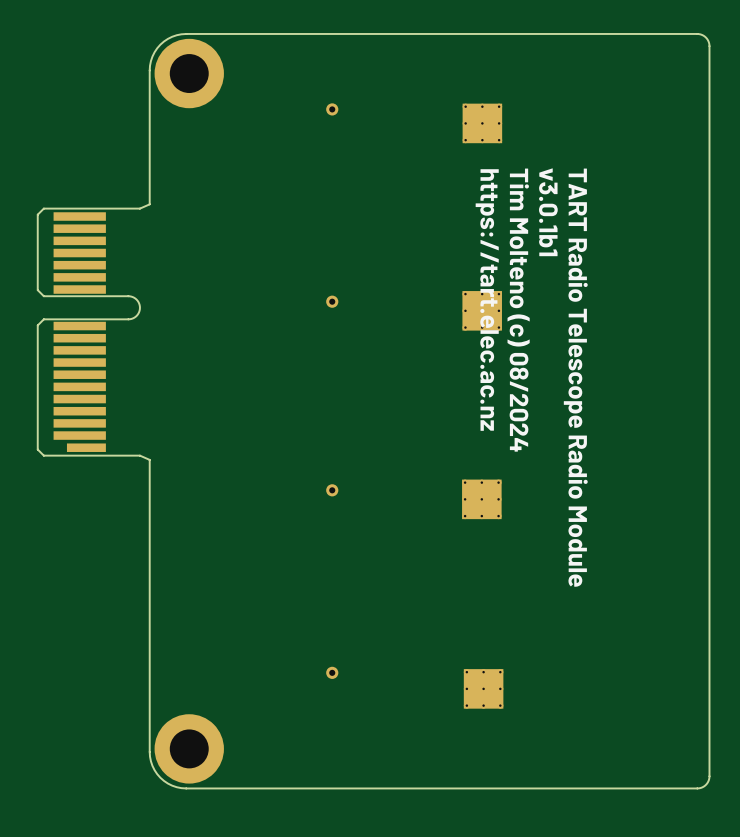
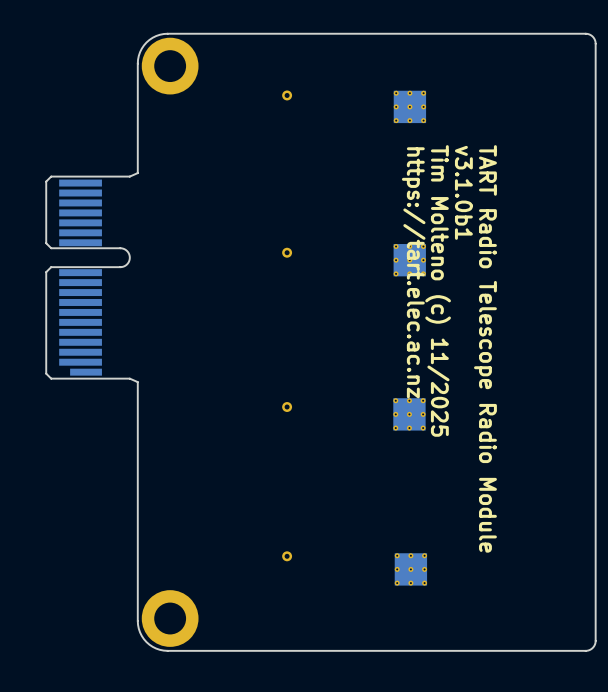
text: v3.0.1b1 (548, 212) -> v3.1.0b1 (463, 192)
text: Tim Molteno (c) 08/2024 (518, 310) -> Tim Molteno (c) 11/2025 (438, 290)

